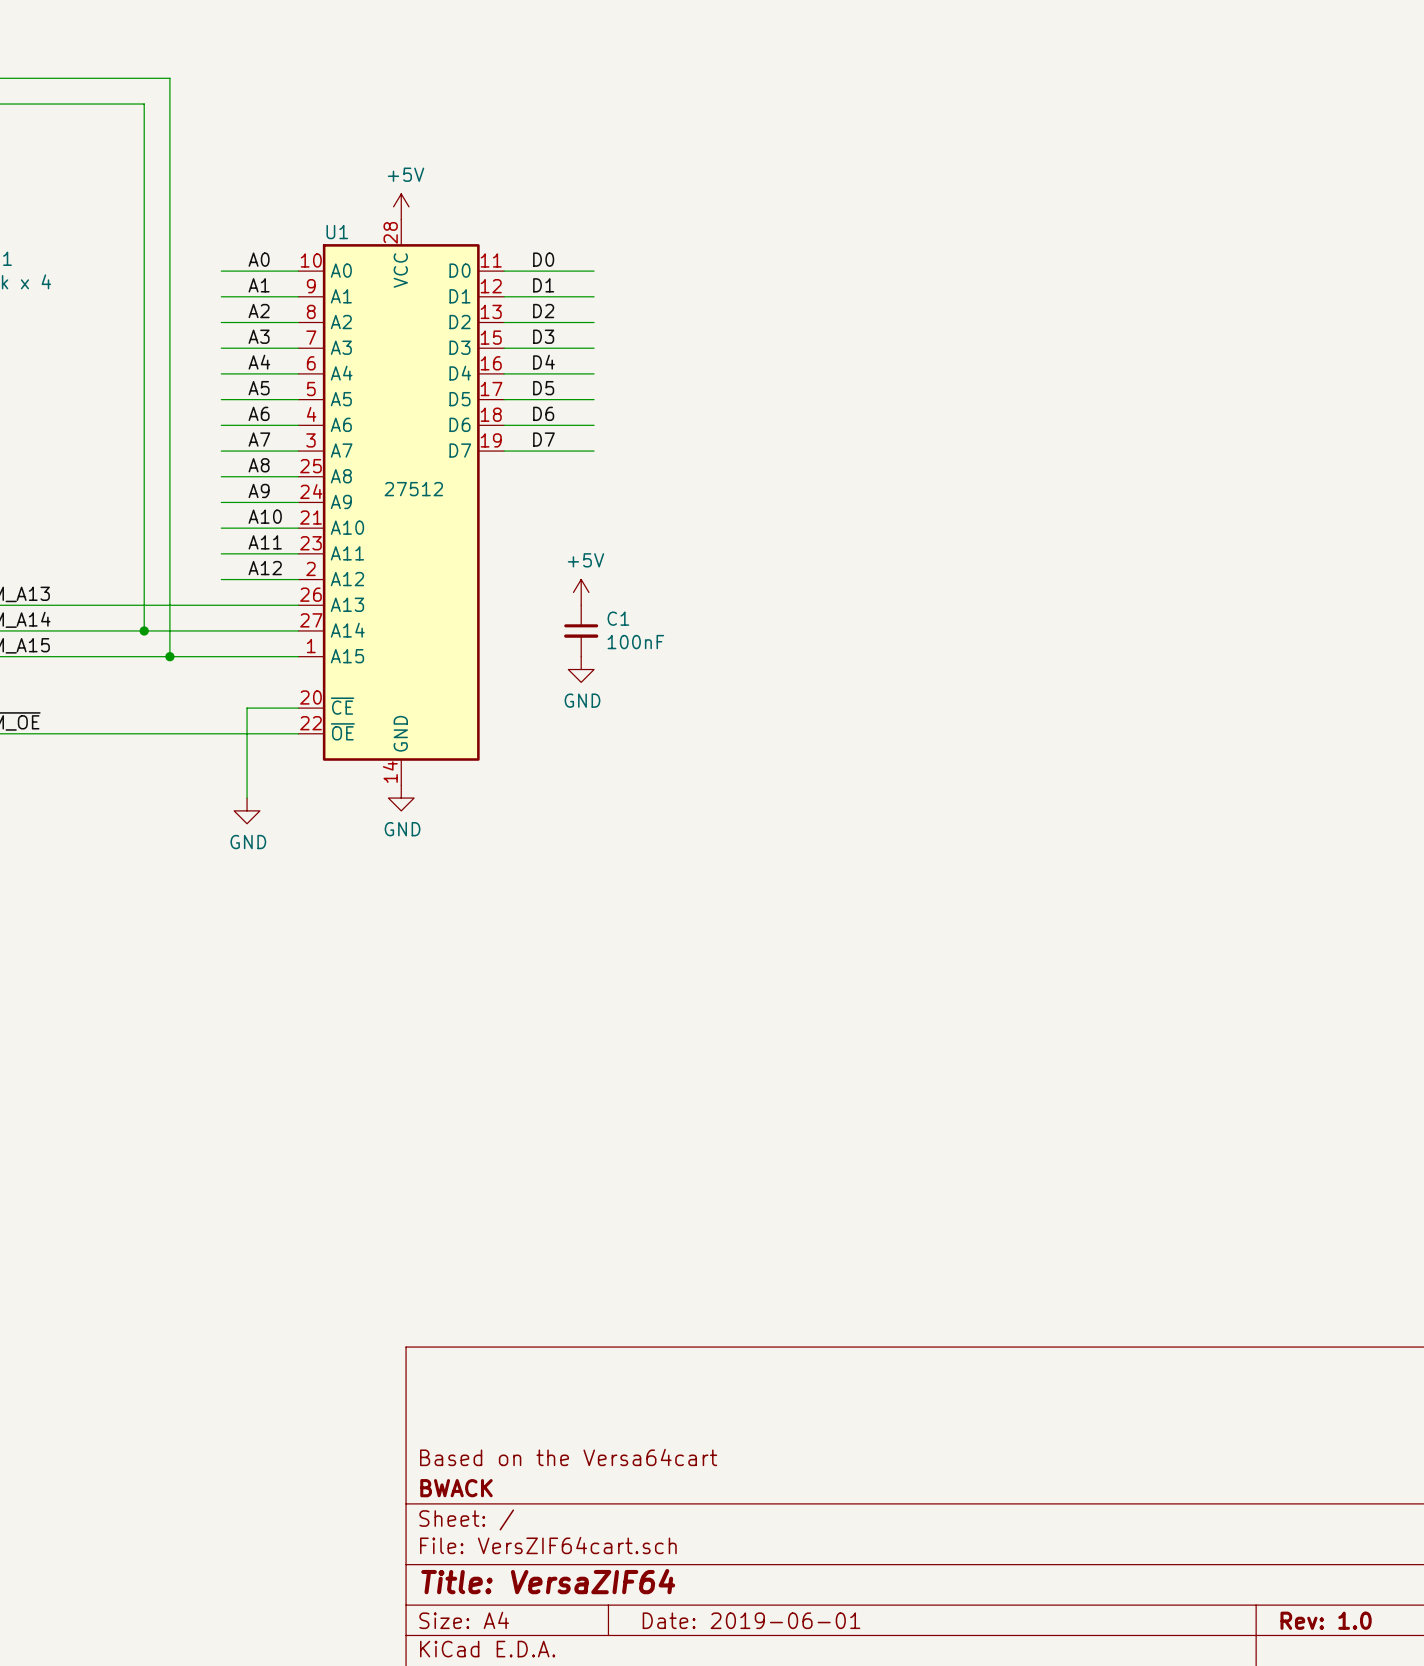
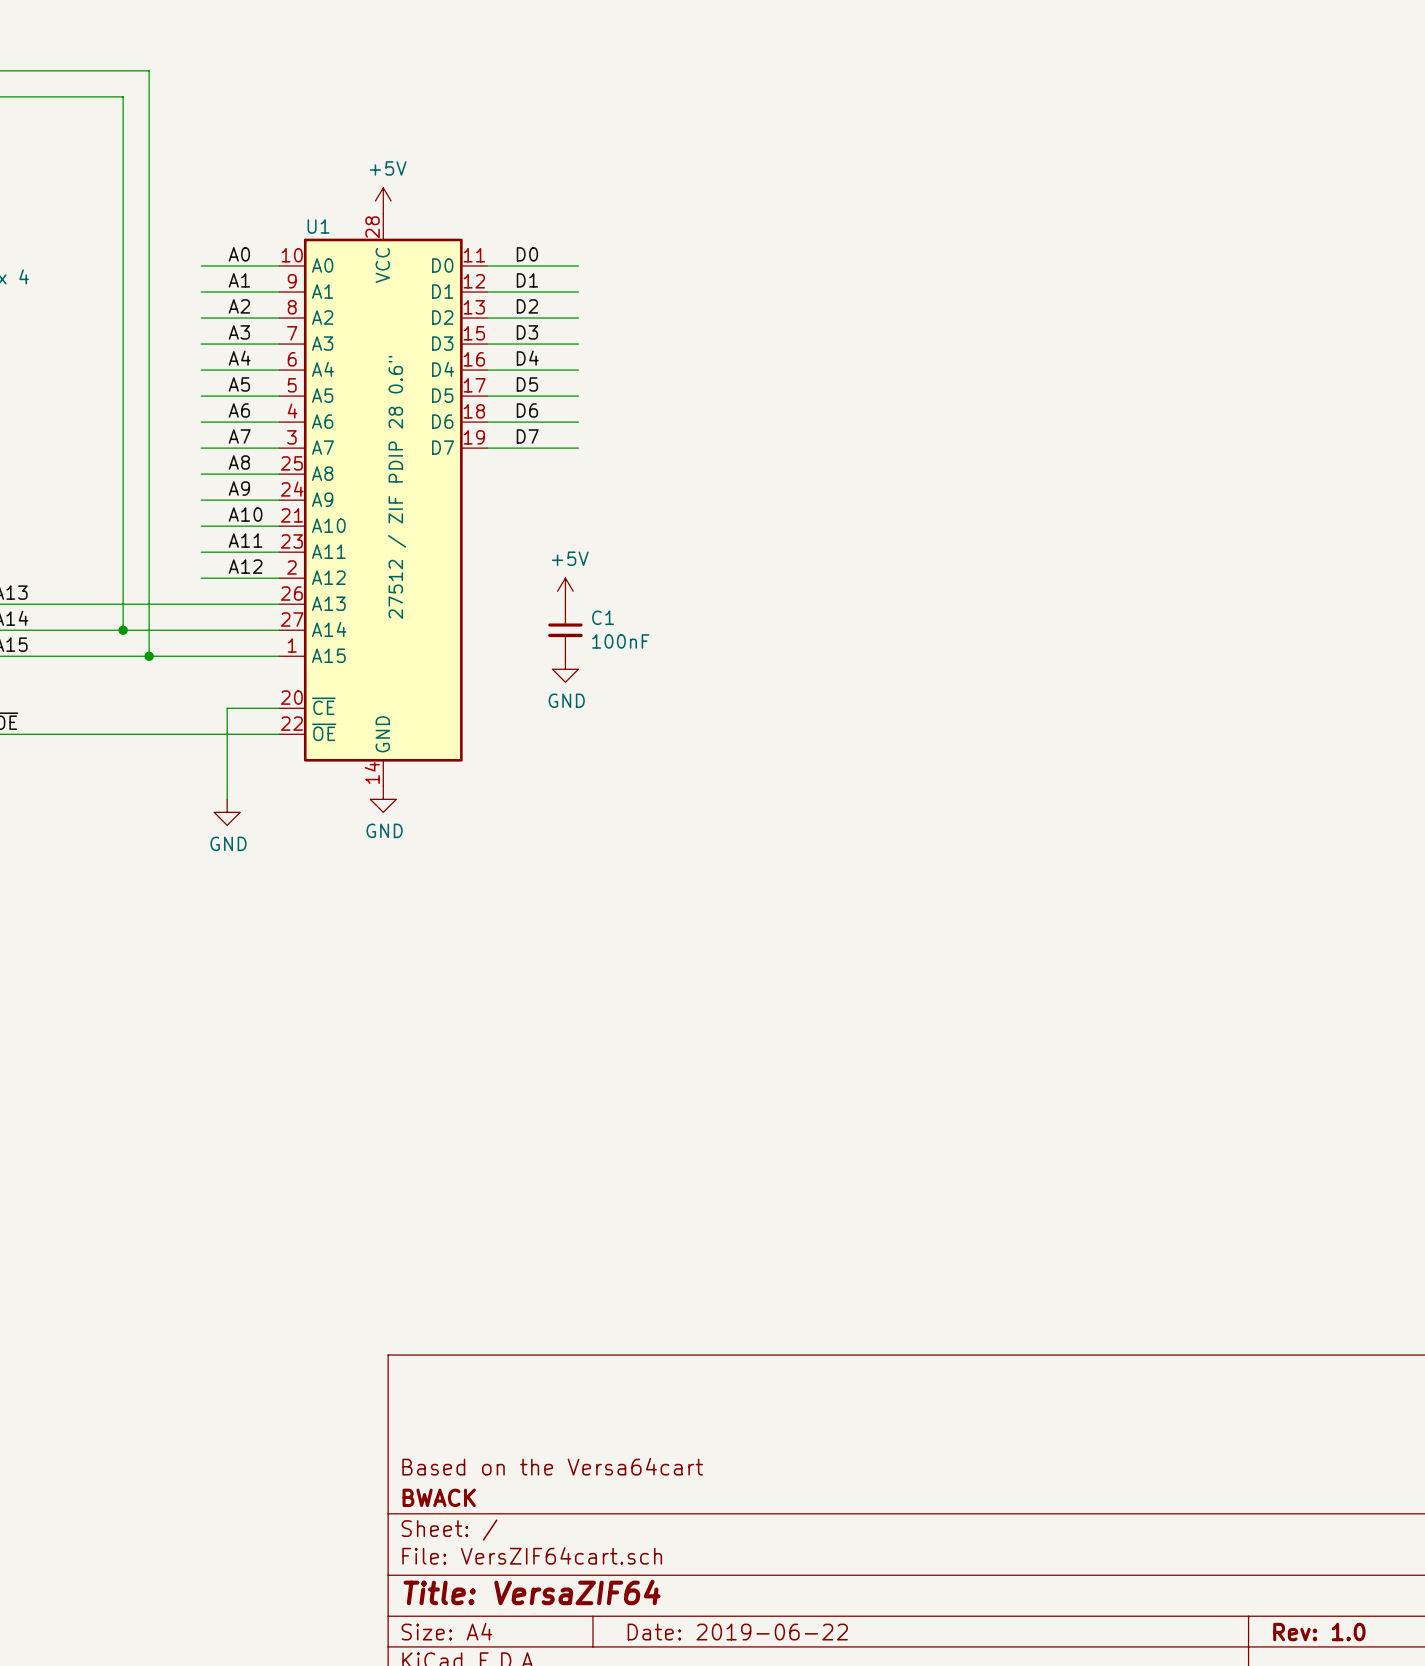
U1 value: 27512 (413, 489) -> 27512 / ZIF PDIP 28 0.6" (397, 487)
title block: Date: 2019-06-01 (751, 1620) -> Date: 2019-06-22 (737, 1632)

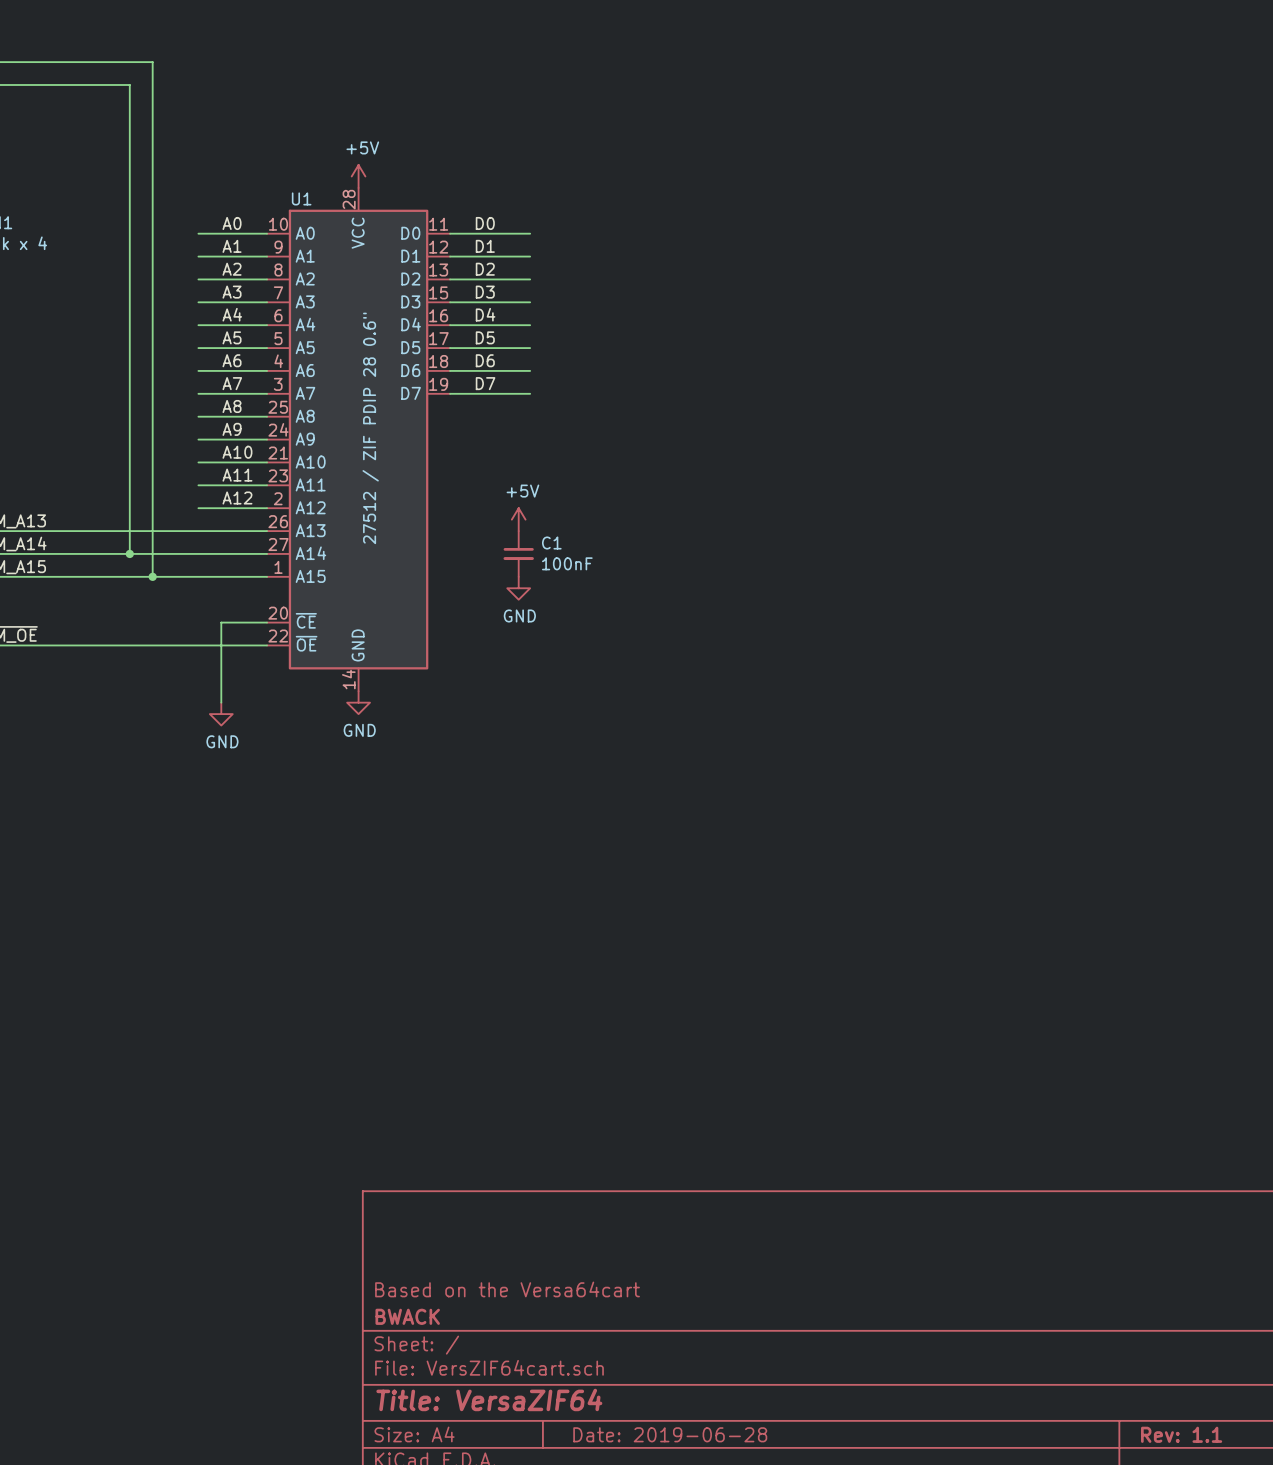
title block: Date: 2019-06-22 (737, 1632) -> Date: 2019-06-28 (670, 1434)
title block: Rev: 1.0 (1319, 1632) -> Rev: 1.1 (1181, 1434)

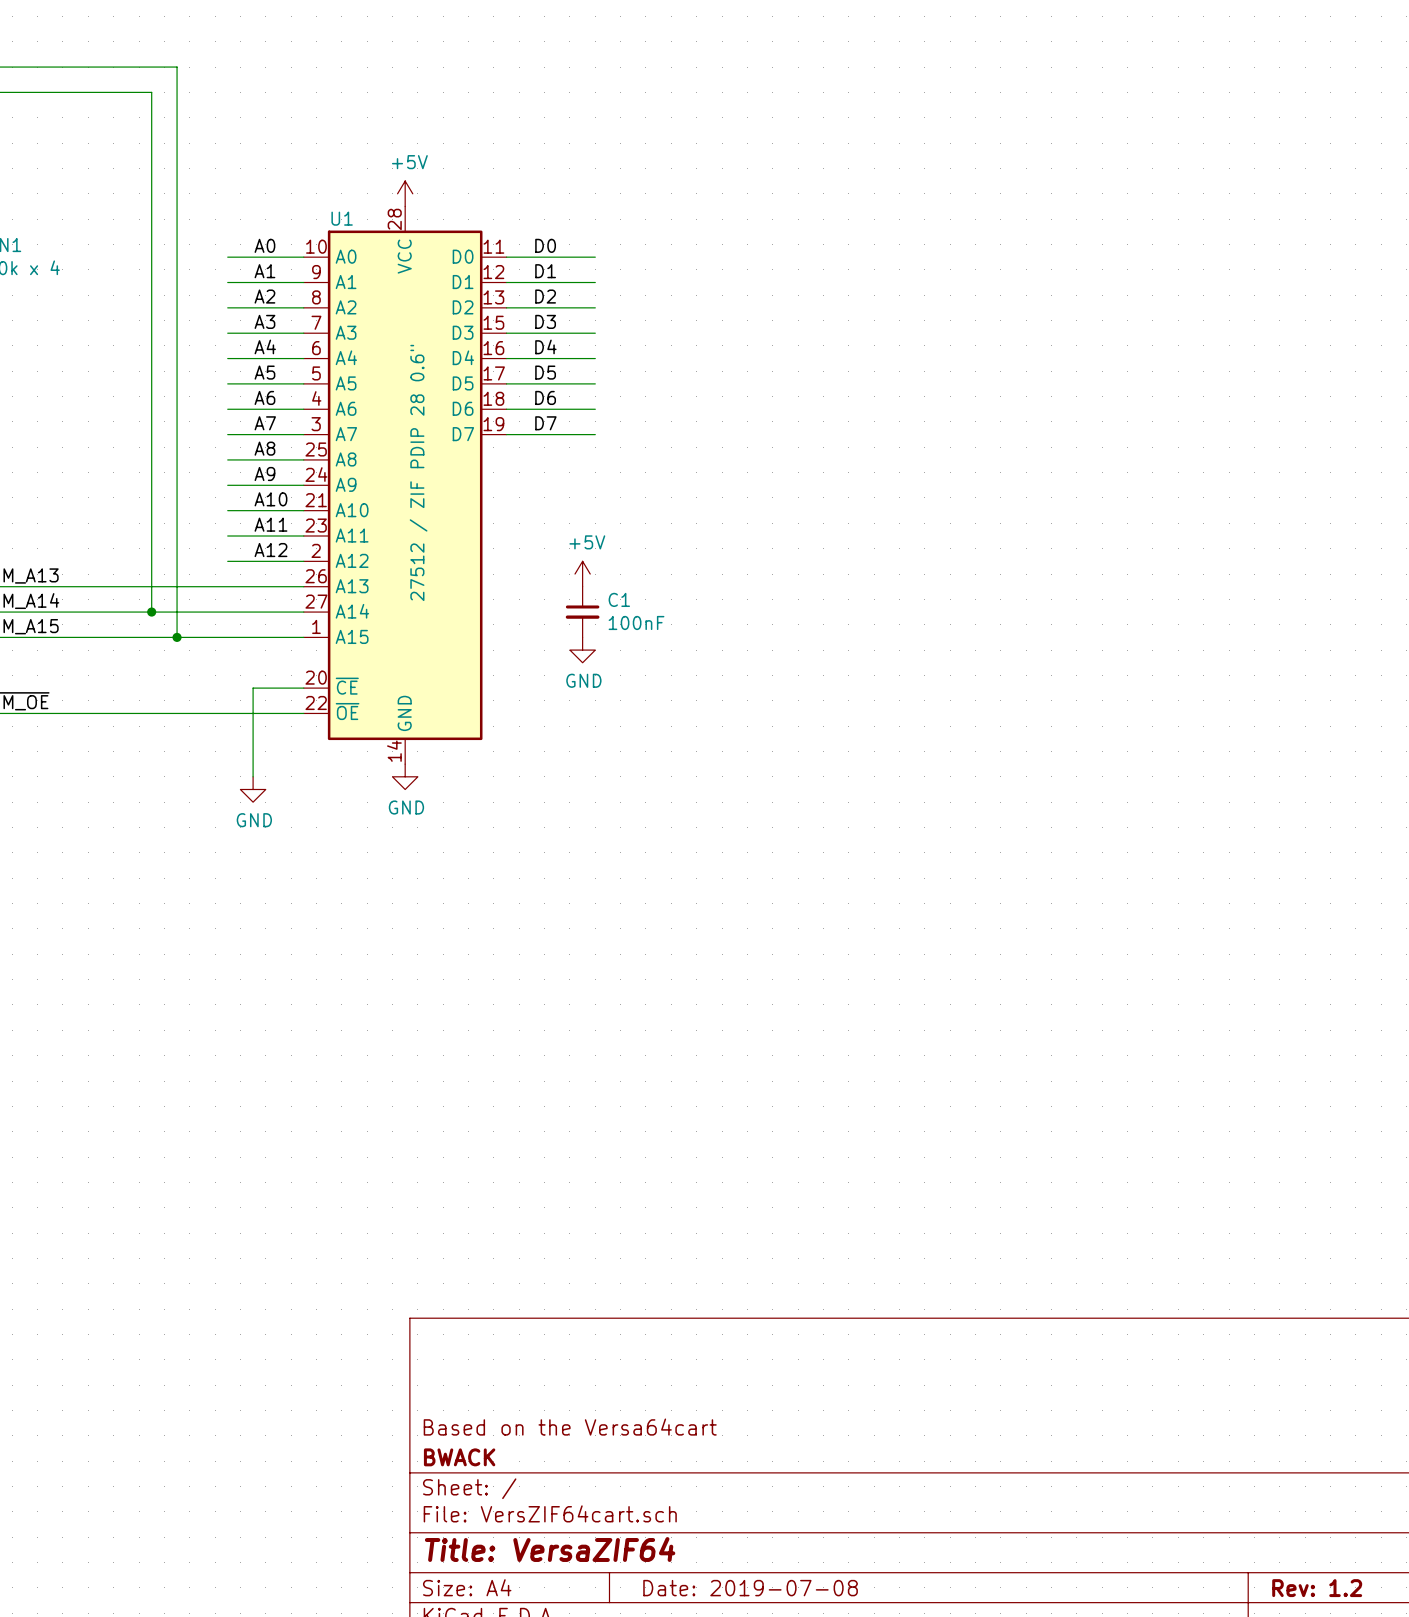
title block: Date: 2019-06-28 (670, 1434) -> Date: 2019-07-08 (750, 1588)
title block: Rev: 1.1 (1181, 1434) -> Rev: 1.2 (1317, 1588)

